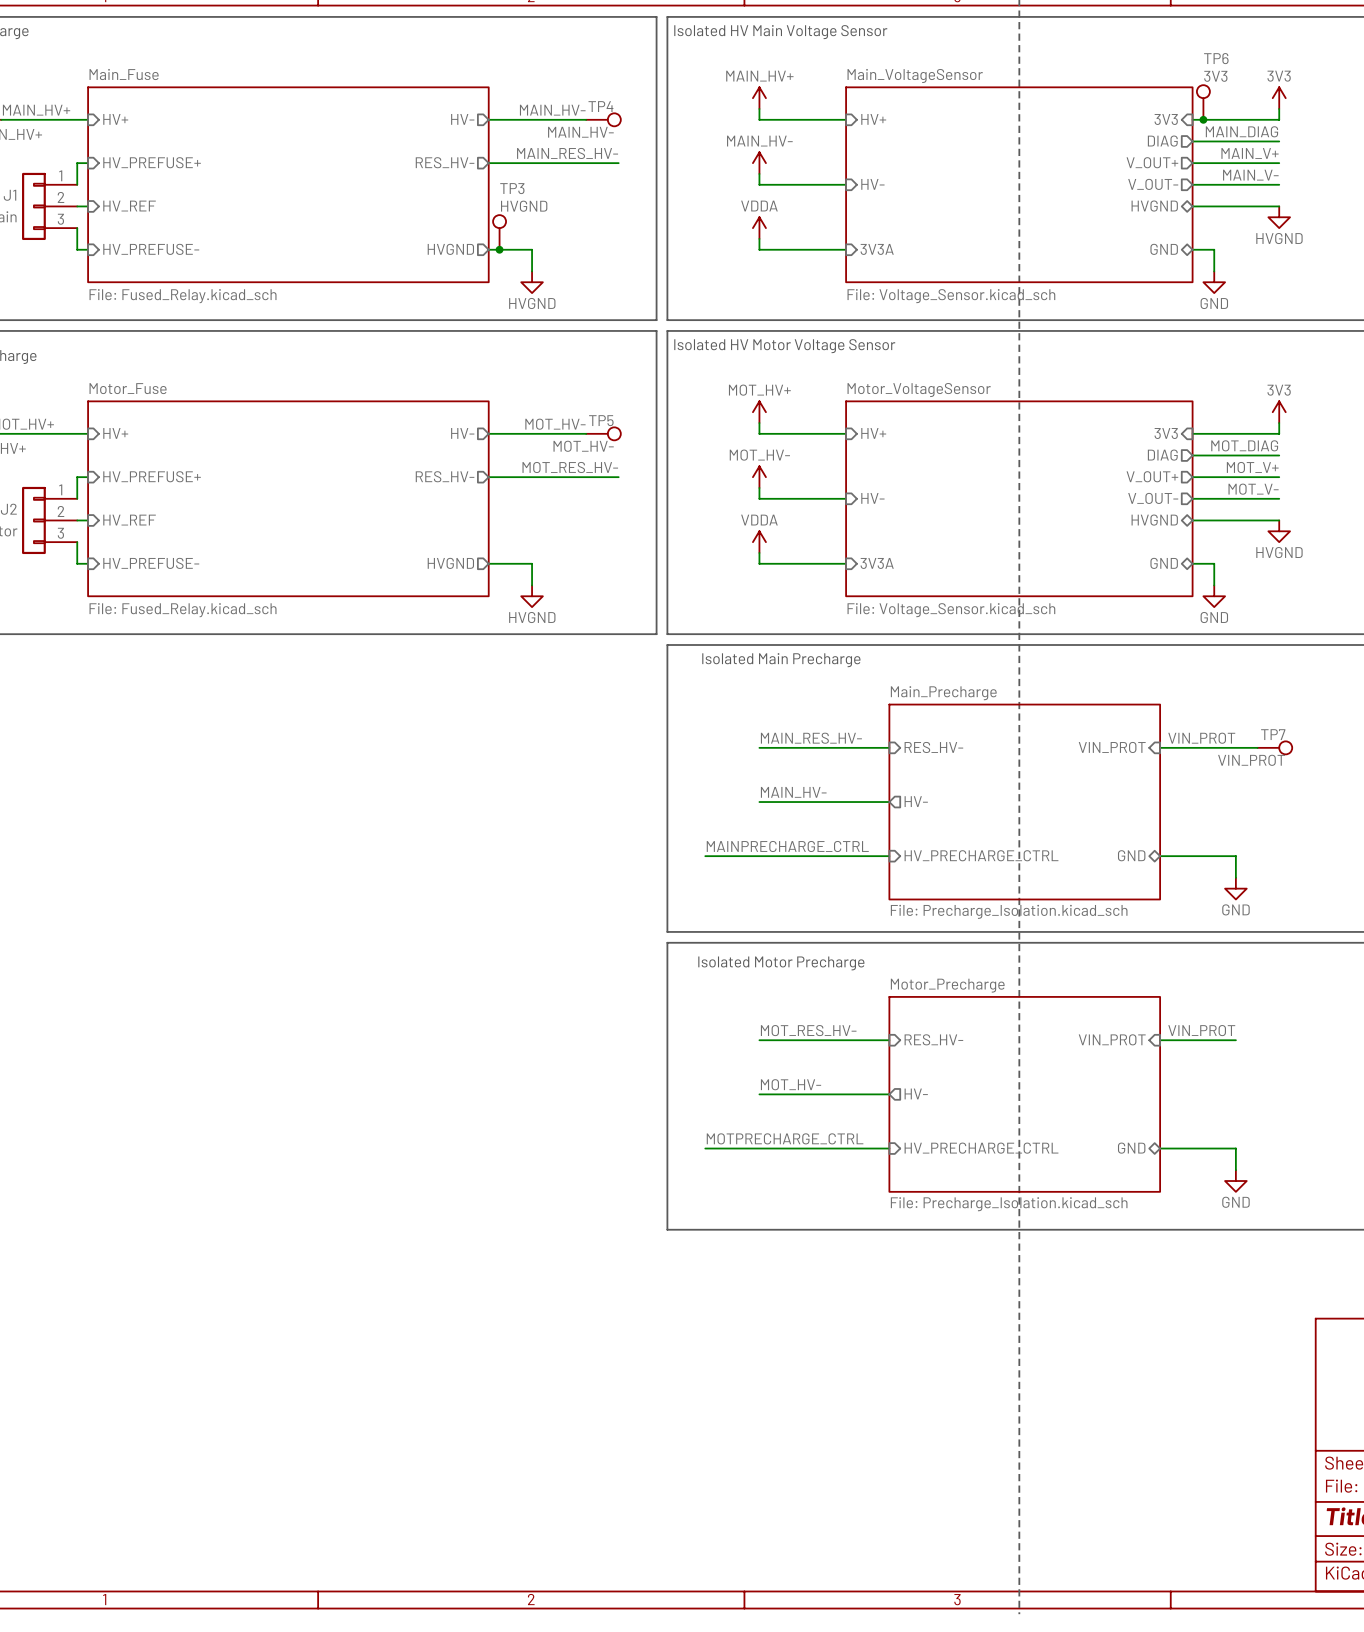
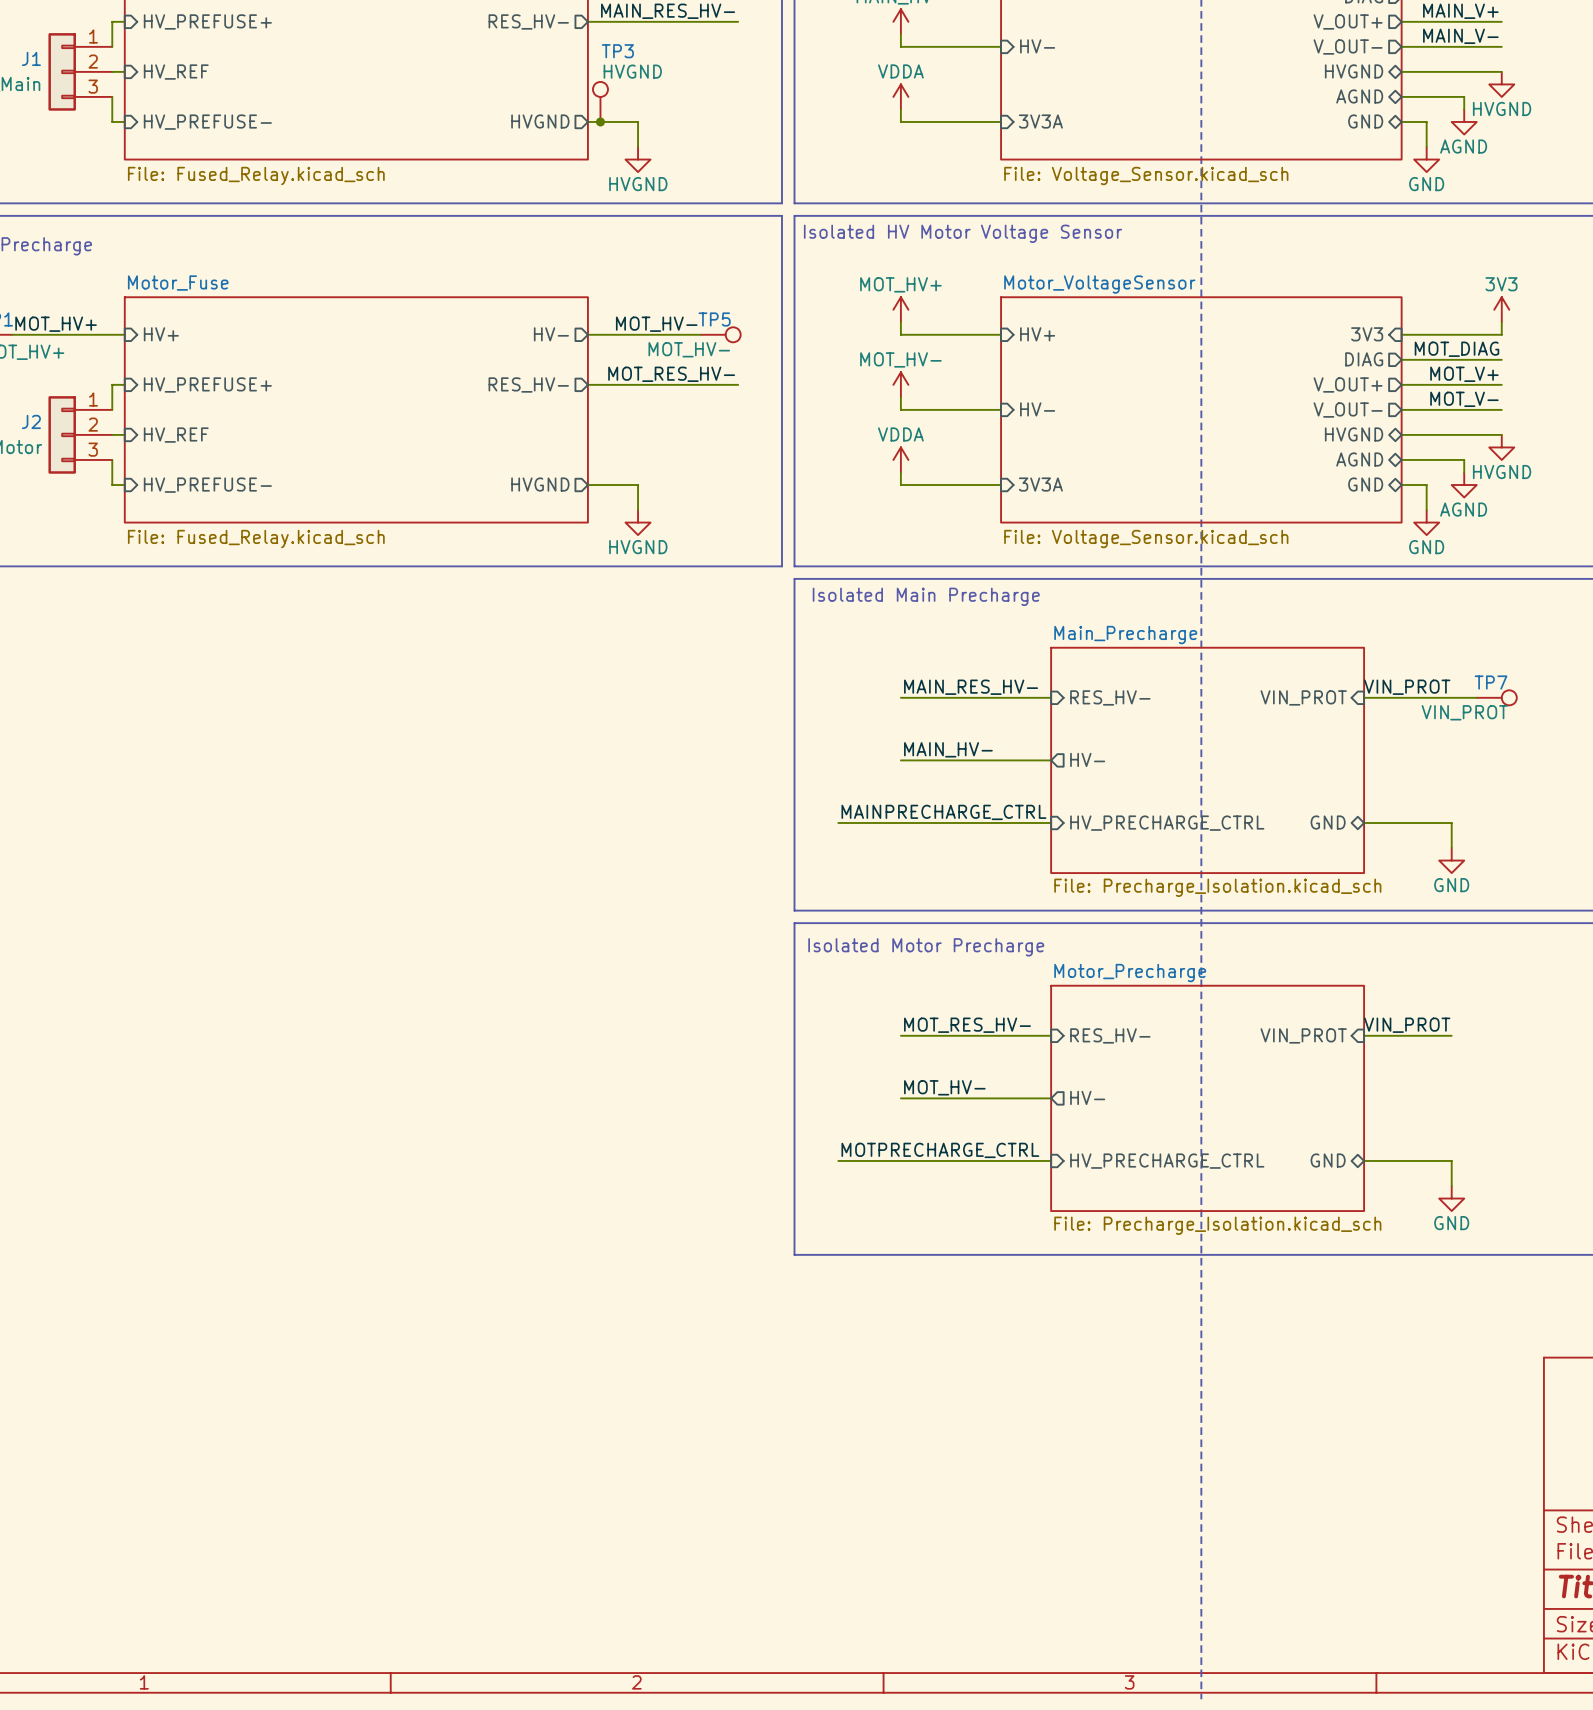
sheet pin: none -> AGND (1359, 96)
wire: none -> (1401, 96) (1464, 96) (1464, 109)
power symbol: none -> AGND (1464, 121)
sheet pin: none -> AGND (1359, 459)
wire: none -> (1401, 459) (1464, 459) (1464, 472)
power symbol: none -> AGND (1464, 485)

